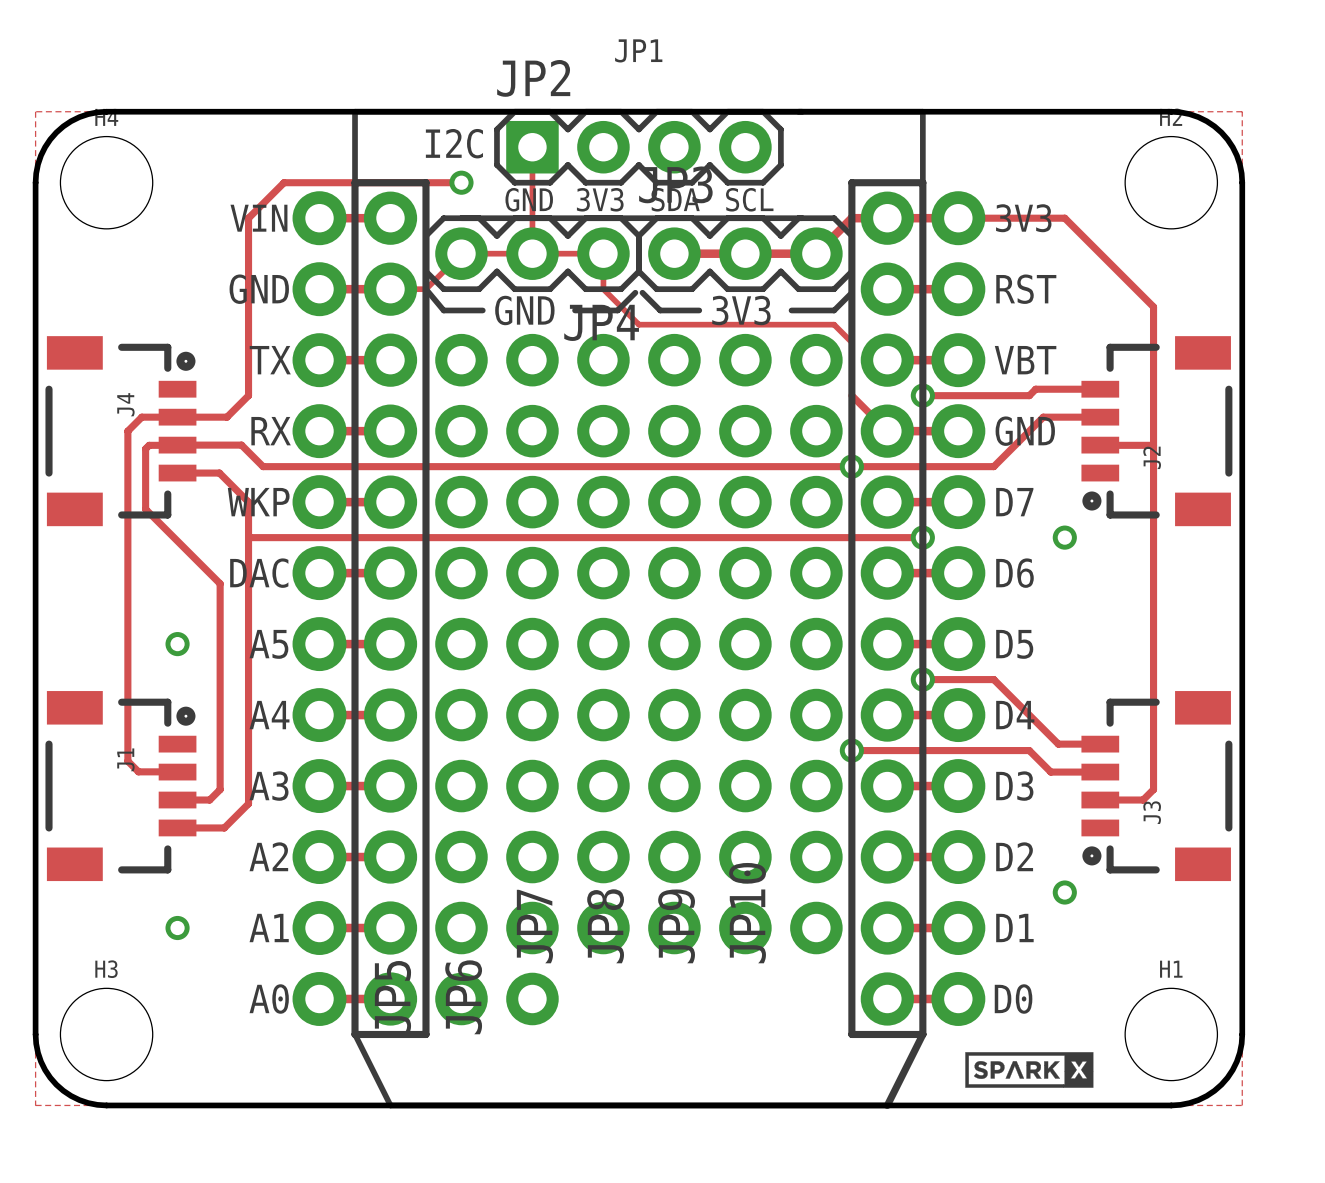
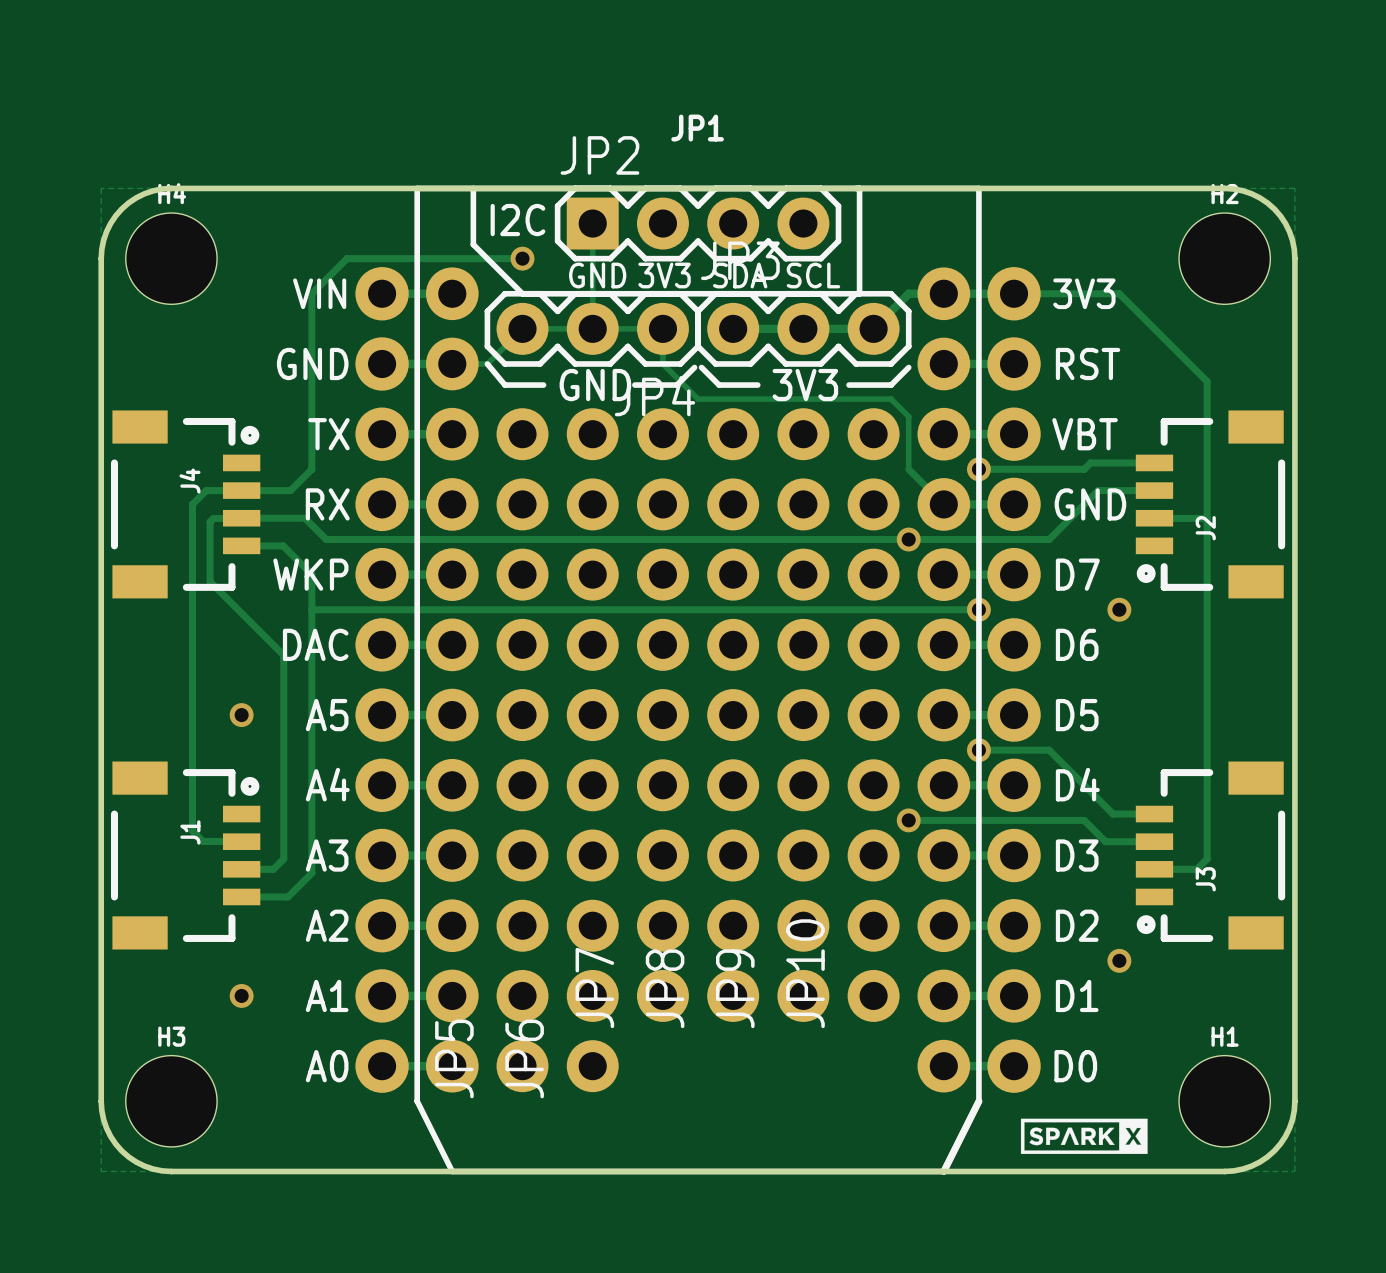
line: none -> (473, 188) (473, 244) (522, 293)
line: none -> (859, 188) (859, 293)
line: (355, 182) (425, 182) (425, 1034) (355, 1034) (355, 182) -> none
line: (851, 182) (922, 182) (922, 1034) (851, 1034) (851, 182) -> none

